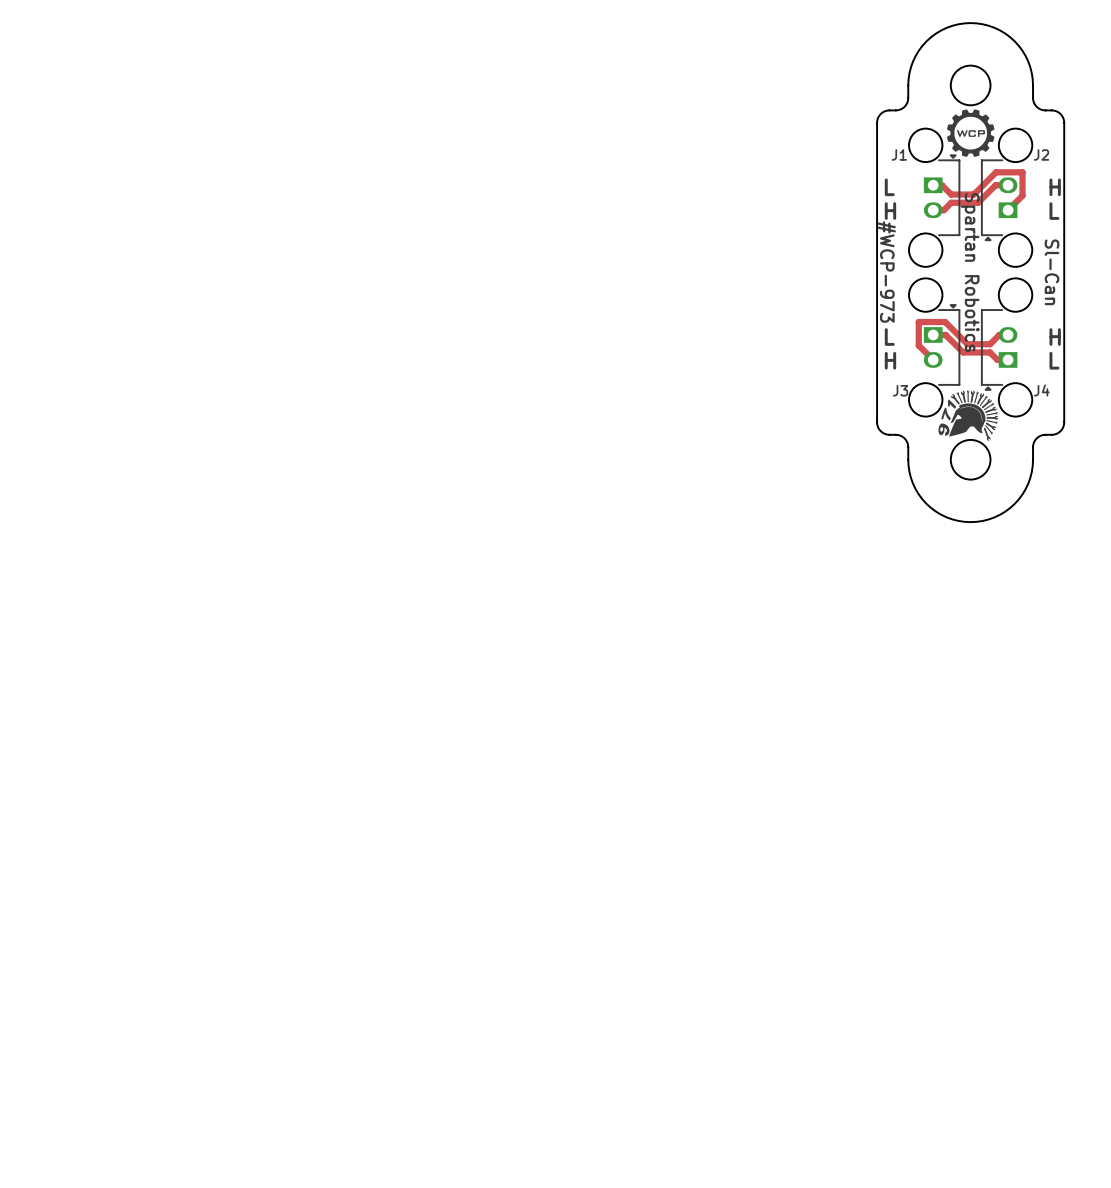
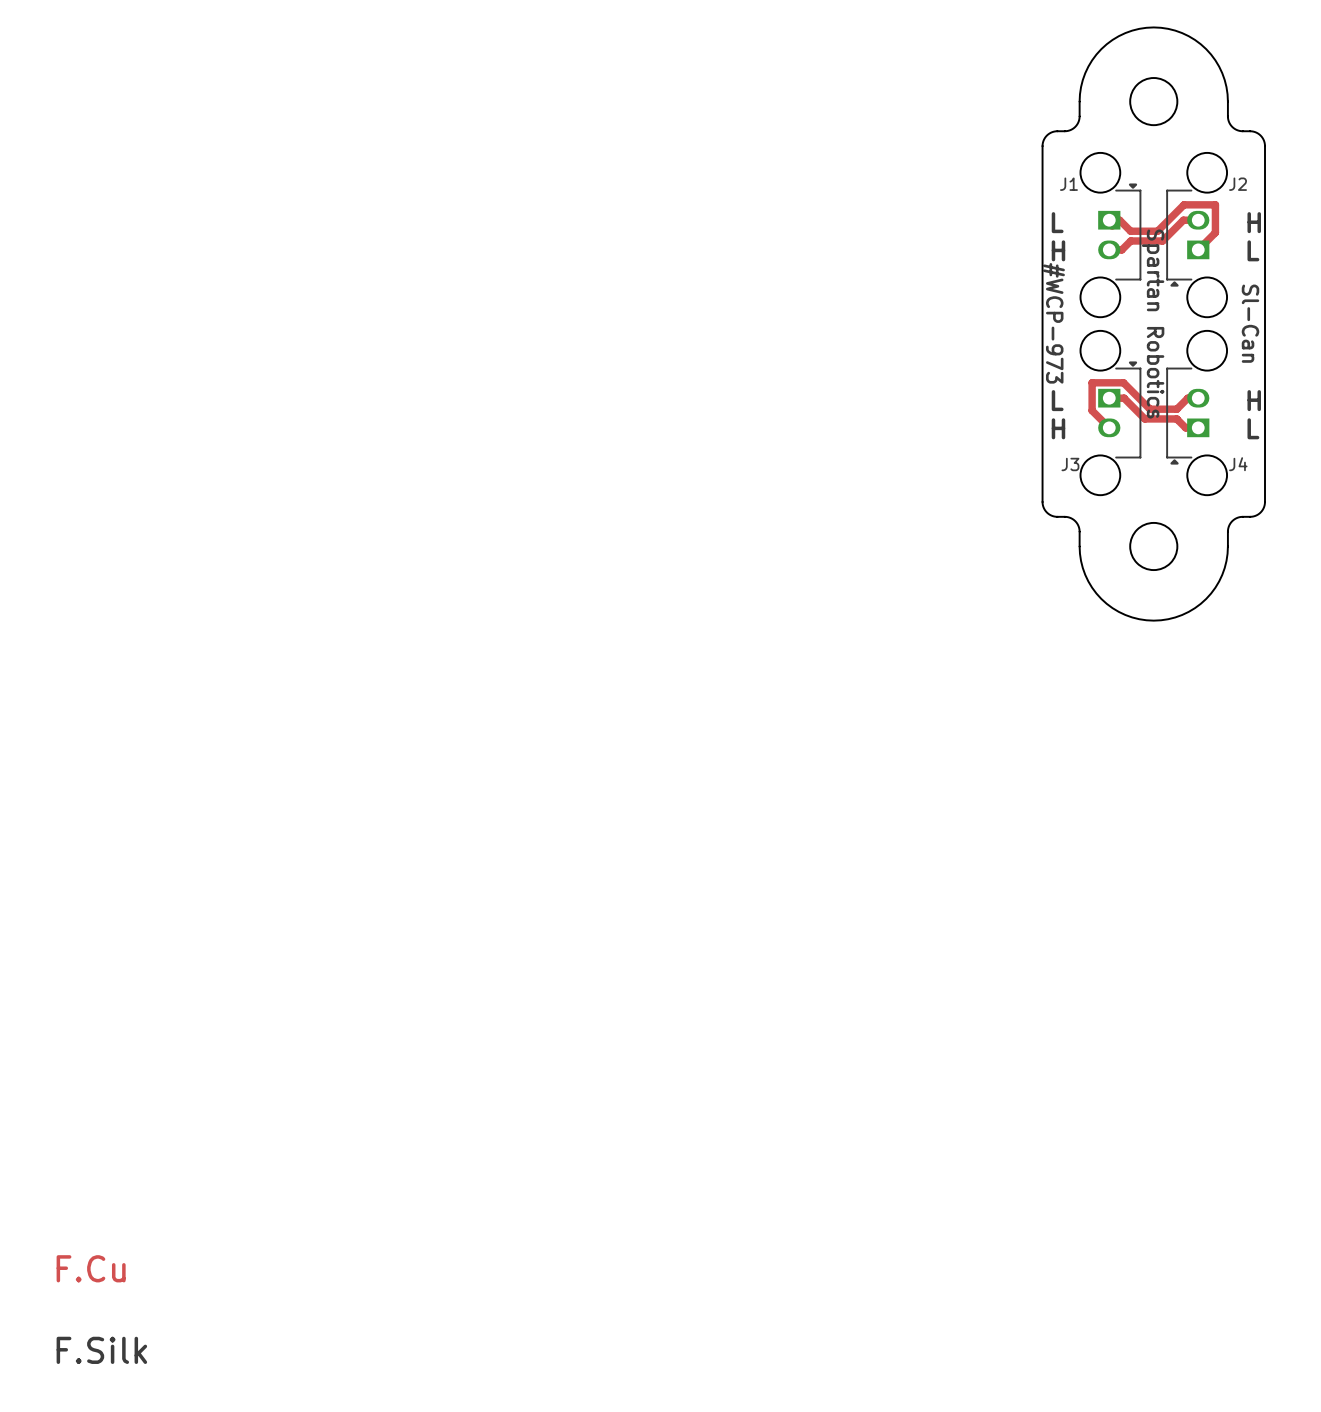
drawing: [947, 109, 995, 157] -> none
drawing: [938, 390, 999, 441] -> none
text: none -> F.Cu (91, 1268)
text: none -> F.Silk (101, 1350)

